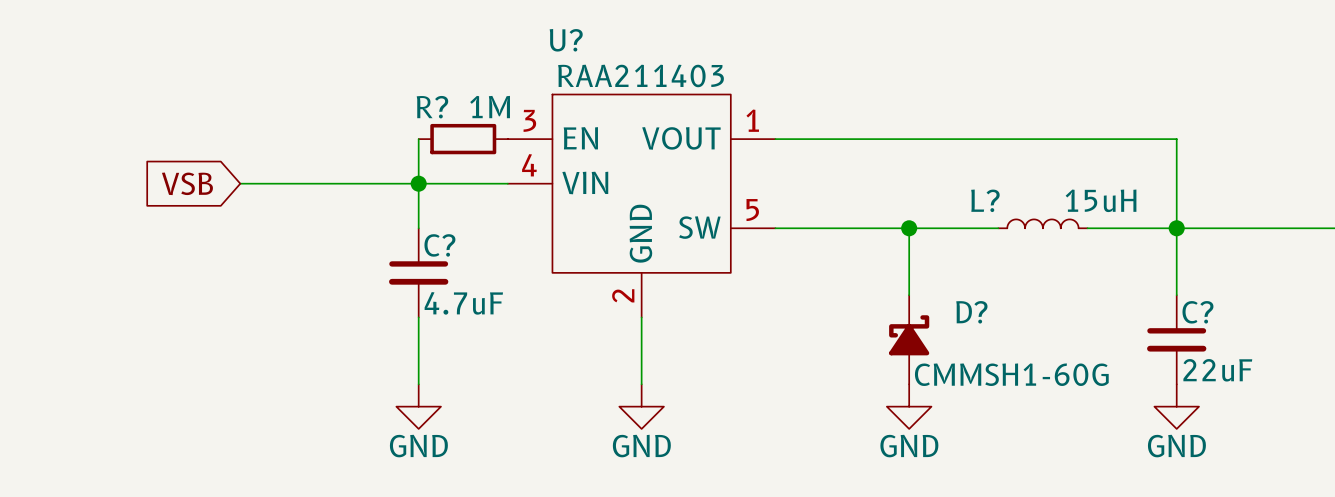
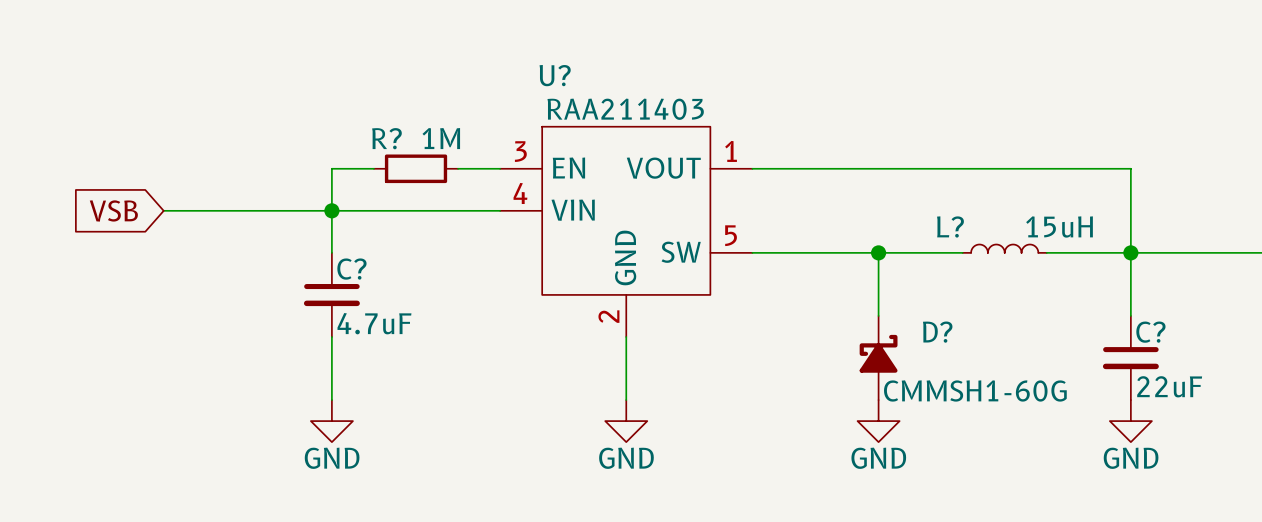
wire: none -> (373, 168) (331, 168) (331, 252)
wire: (418, 139) (418, 228) -> none
wire: none -> (458, 168) (500, 168)
R? position: (463, 139) -> (416, 168)
wire: none -> (163, 210) (247, 210)
global label position: VSB (187, 183) -> VSB (113, 210)
junction position: (418, 183) -> (331, 210)
C? position: (418, 272) -> (331, 294)
wire: (418, 317) (418, 384) -> (331, 336) (331, 400)
power symbol position: GND (418, 406) -> GND (331, 421)

